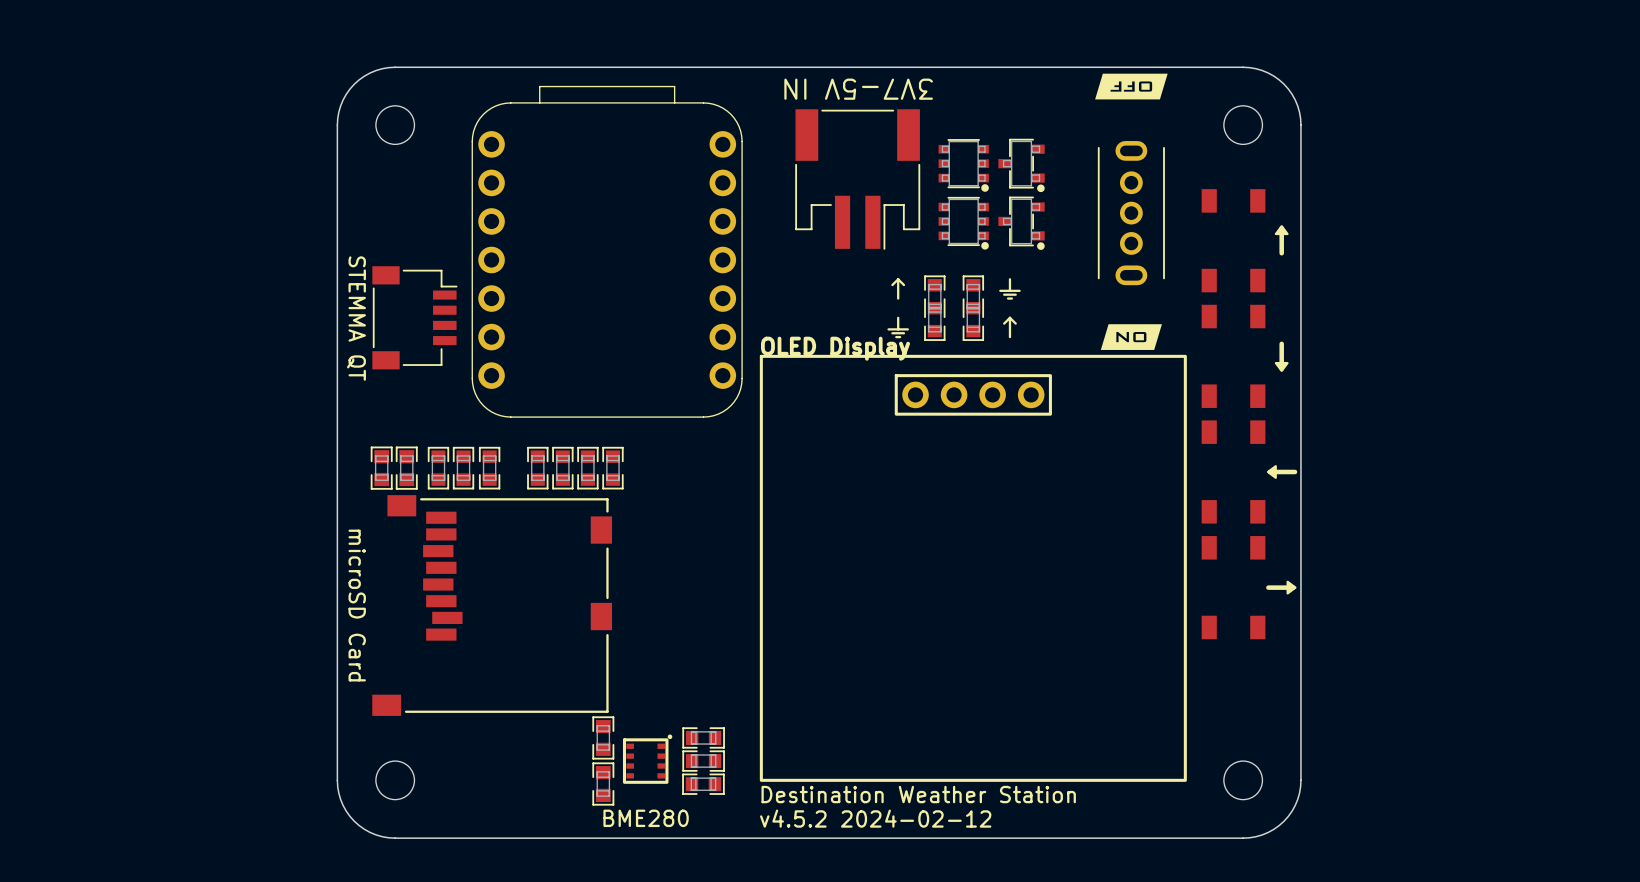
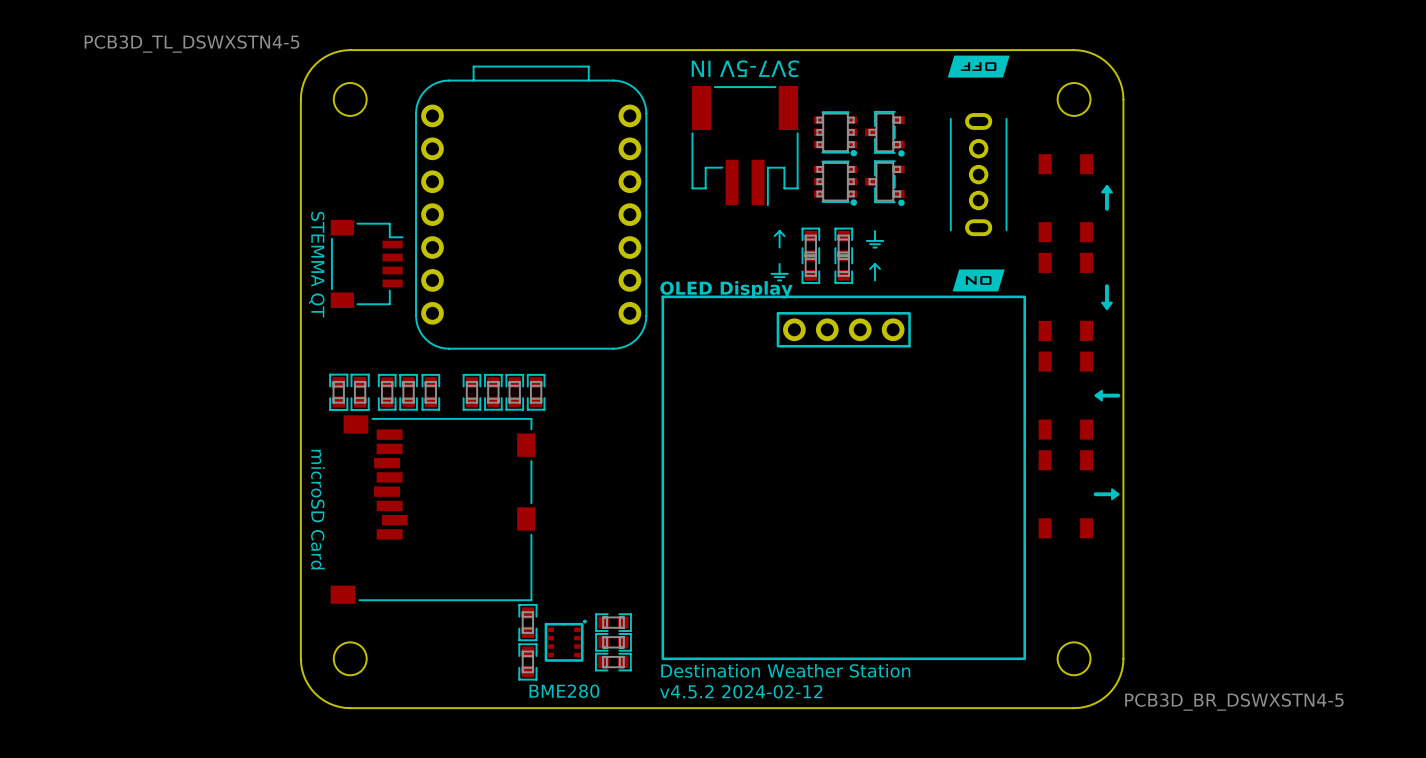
text: none -> PCB3D_TL_DSWXSTN4-5 (192, 44)
text: none -> PCB3D_BR_DSWXSTN4-5 (1234, 702)

